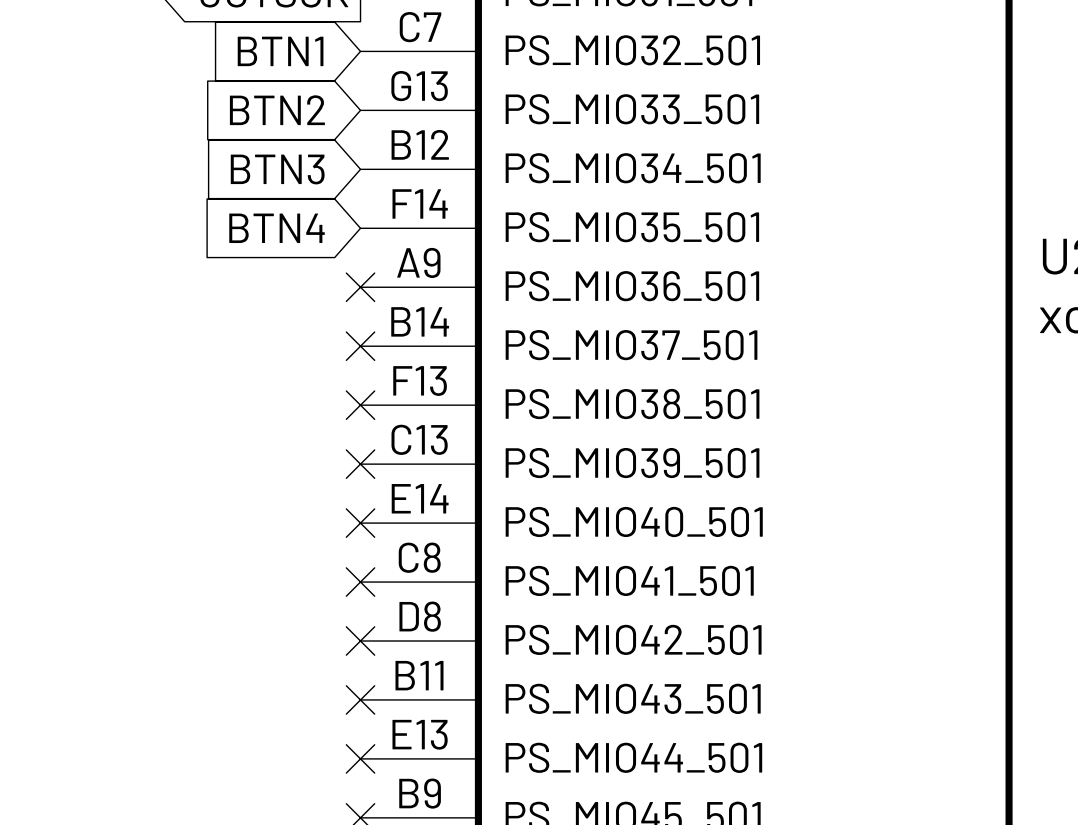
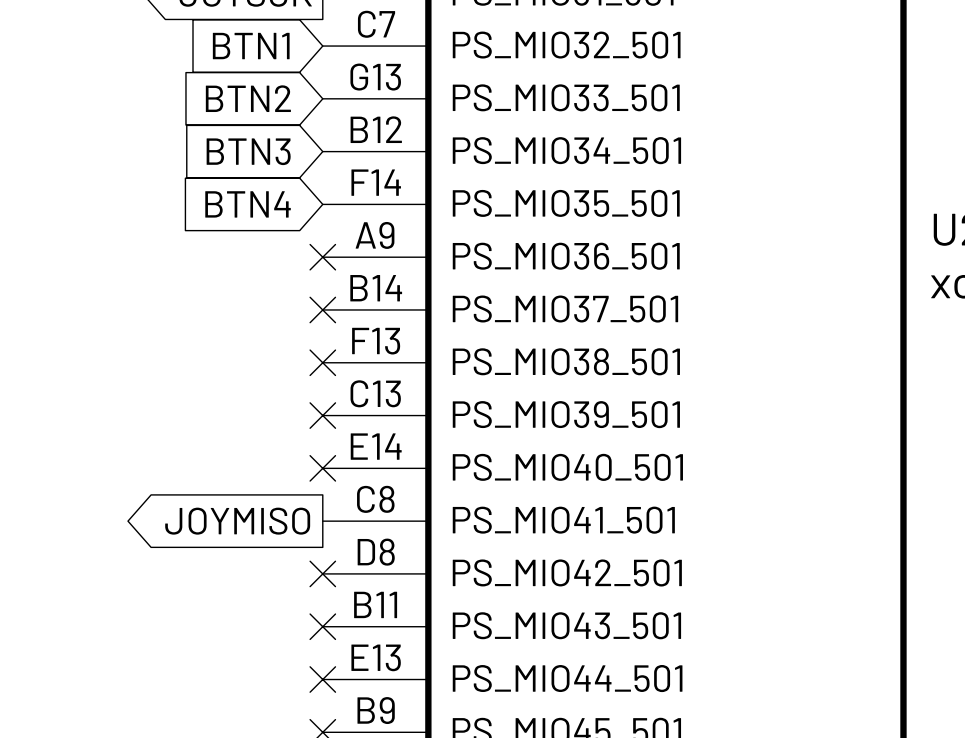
global label: none -> JOYMISO (237, 521)
no-connect mark: (360, 582) -> none

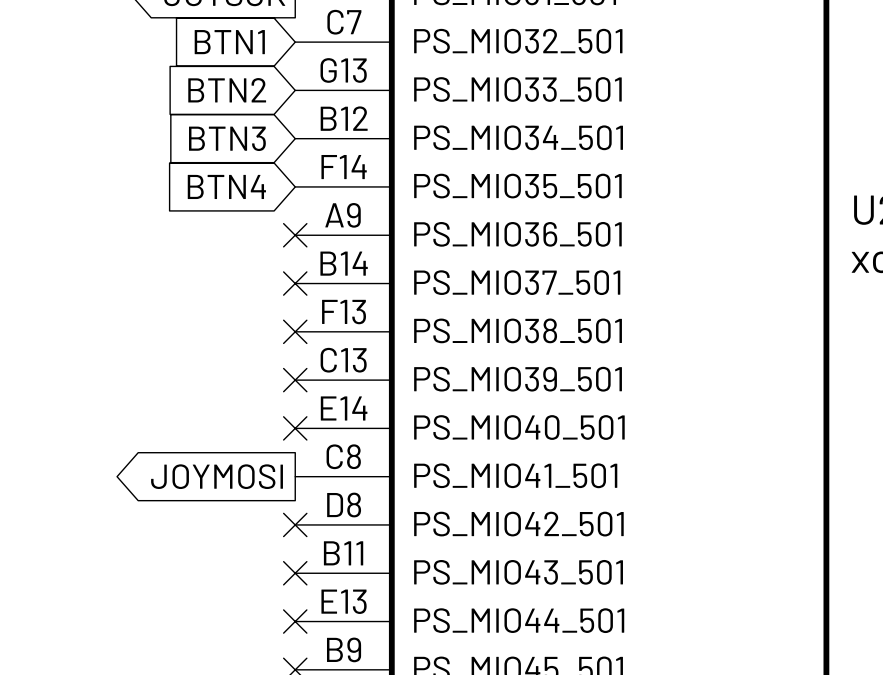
global label: JOYMISO (237, 521) -> JOYMOSI (217, 476)

